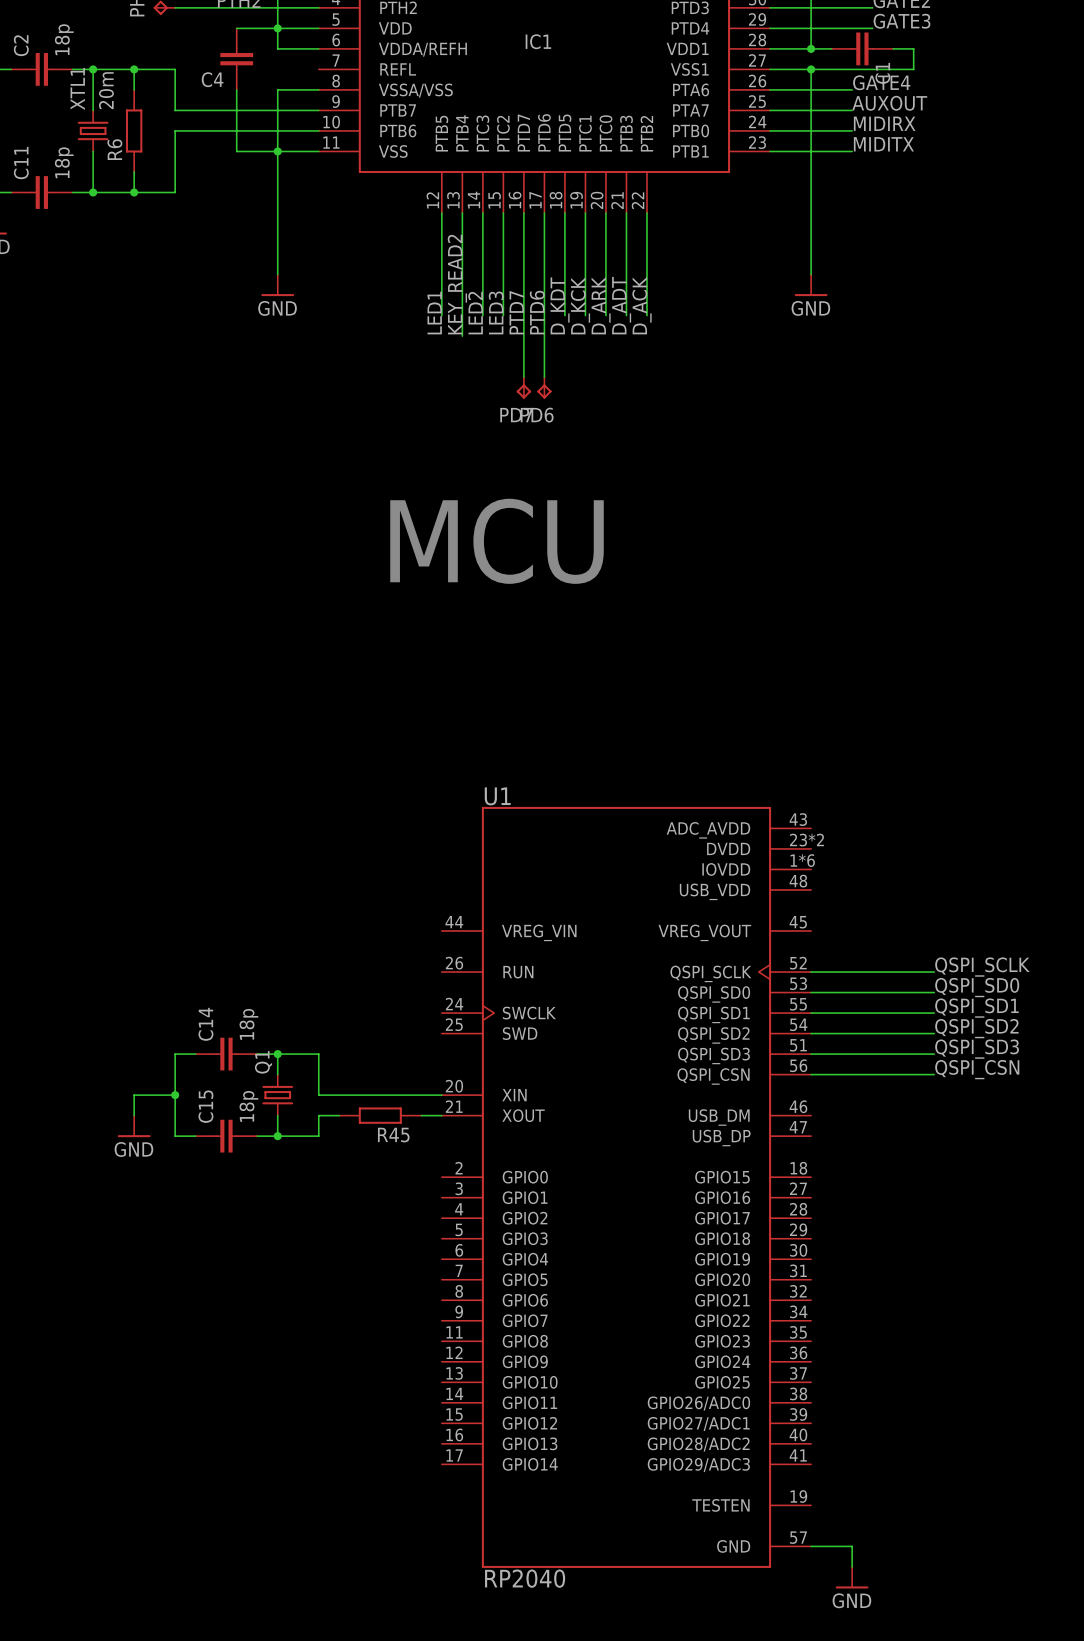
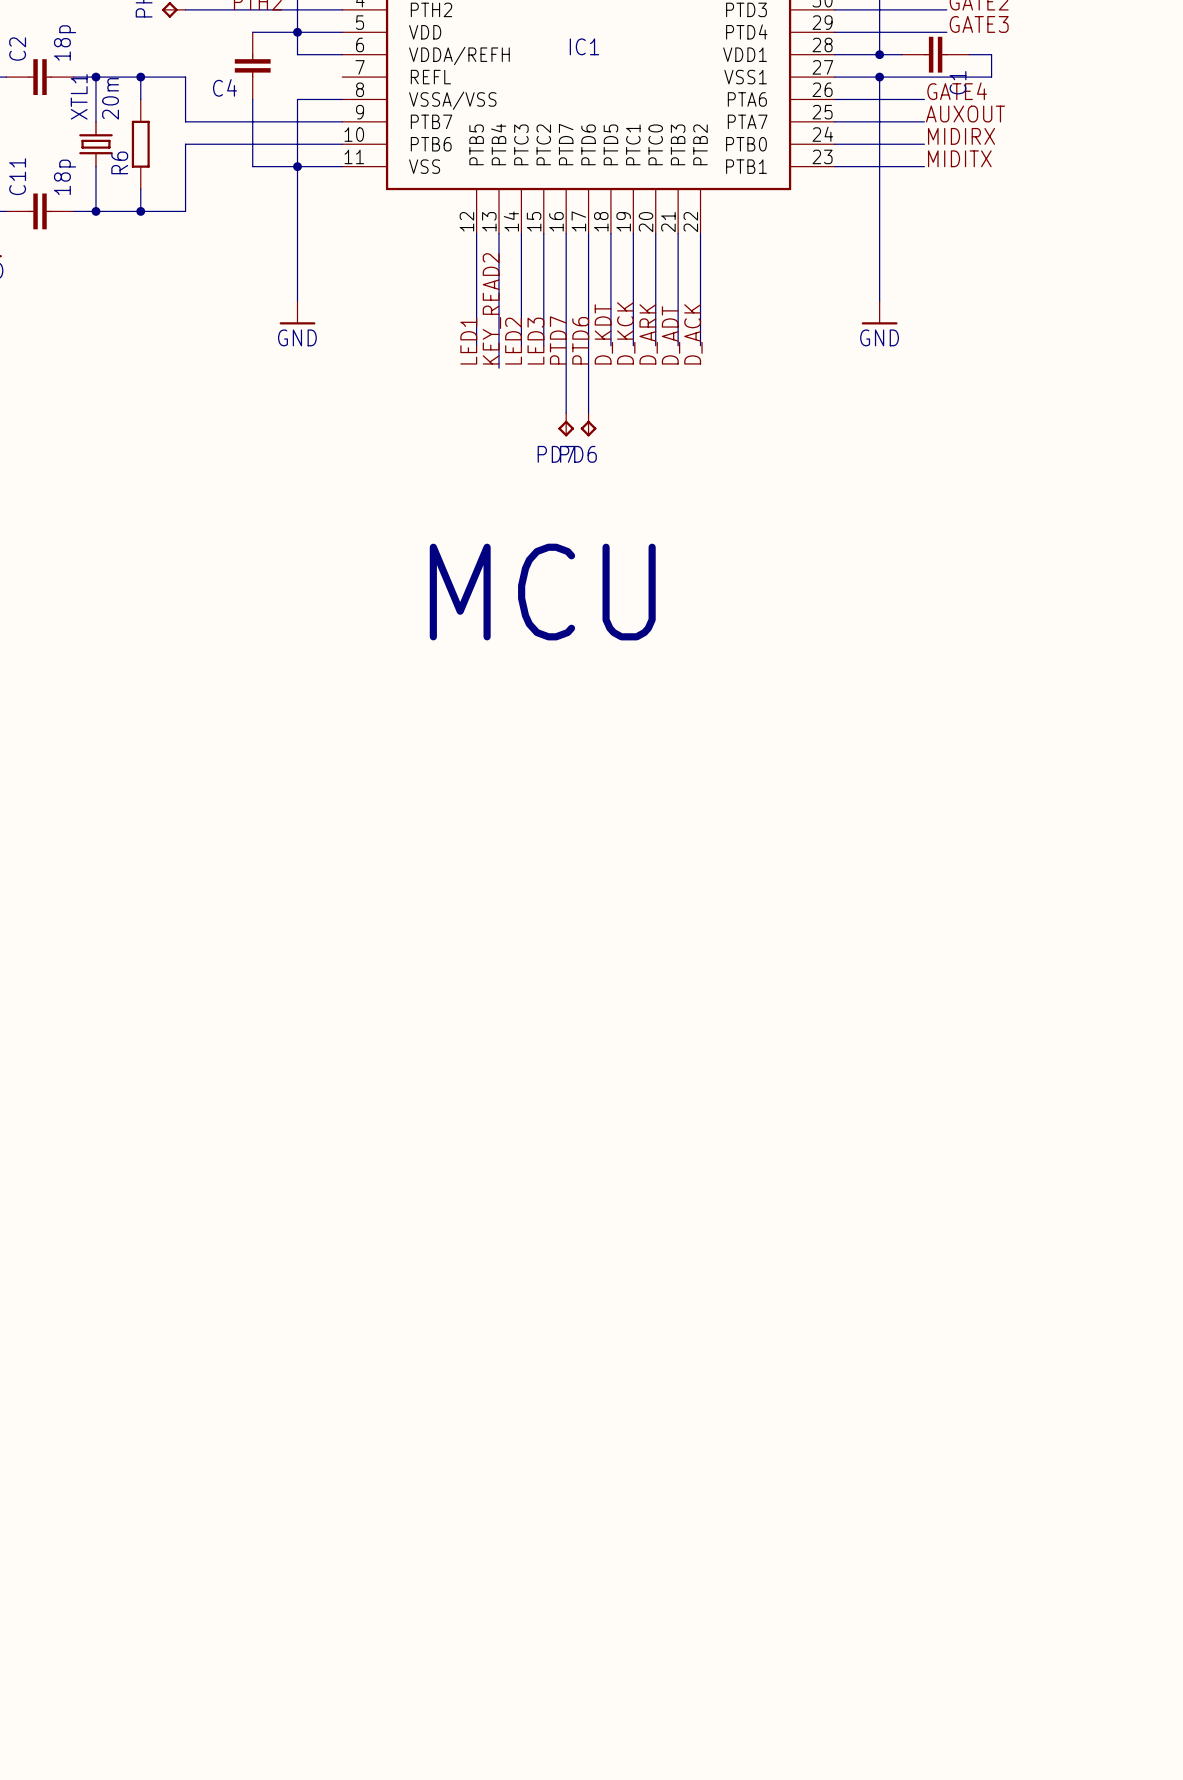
label: QSPI_SCLK (982, 967) -> none
wire: (811, 972) (934, 972) -> none
label: QSPI_SD0 (977, 987) -> none
wire: (811, 992) (934, 992) -> none
label: QSPI_SD1 (976, 1008) -> none
wire: (811, 1013) (934, 1013) -> none
label: QSPI_SD2 (976, 1028) -> none
wire: (811, 1033) (934, 1033) -> none
label: QSPI_SD3 (977, 1049) -> none
wire: (195, 1054) (175, 1054) (175, 1136) (195, 1136) -> none
C14: 18p (226, 1054) -> none
wire: (257, 1054) (318, 1054) (318, 1095) (441, 1095) -> none
wire: (277, 1054) (277, 1074) -> none
junction: (277, 1054) -> none
wire: (811, 1054) (934, 1054) -> none
label: QSPI_CSN (977, 1069) -> none
wire: (811, 1074) (934, 1074) -> none
wire: (175, 1095) (134, 1095) (134, 1115) -> none
junction: (175, 1095) -> none
Q1: (277, 1095) -> none
wire: (277, 1115) (277, 1136) -> none
wire: (339, 1115) (318, 1115) (318, 1136) (257, 1136) -> none
R45: (380, 1115) -> none
wire: (421, 1115) (441, 1115) -> none
power symbol: GND (134, 1126) -> none
C15: 18p (226, 1136) -> none
junction: (277, 1136) -> none
U1: RP2040 (626, 1187) -> none
wire: (811, 1546) (852, 1546) (852, 1566) -> none
power symbol: GND (852, 1577) -> none

